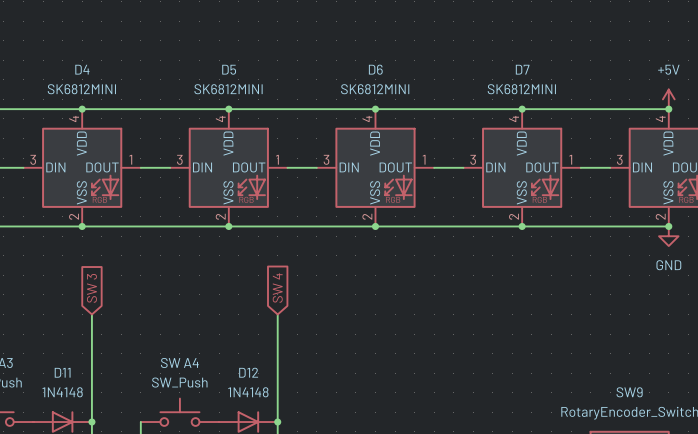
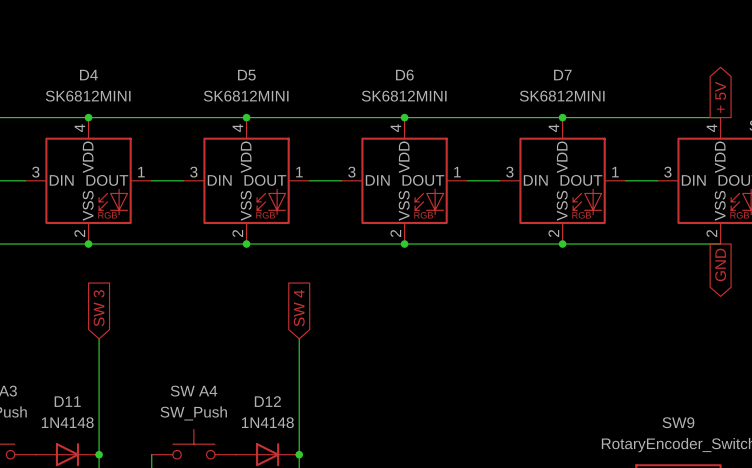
global label: none -> + 5V (720, 97)
power symbol: +5V (668, 99) -> none
junction: (668, 109) -> none
junction: (668, 226) -> none
power symbol: GND (668, 236) -> none
global label: none -> GND (720, 264)

